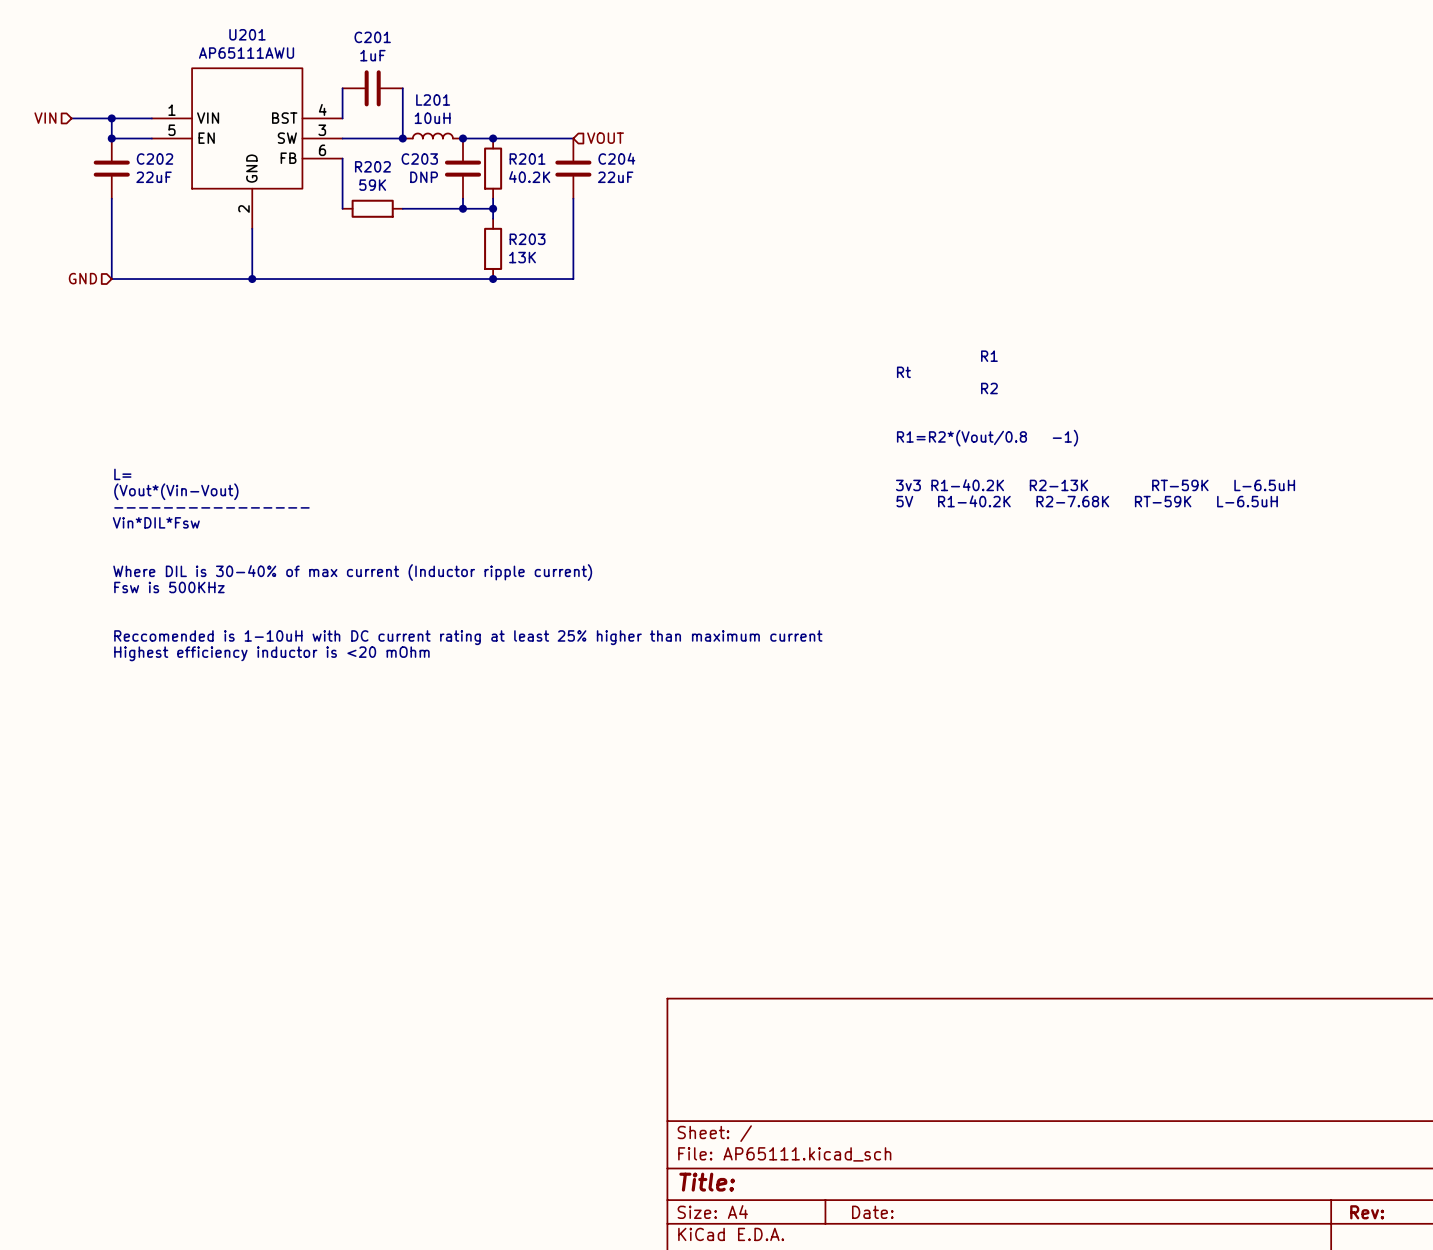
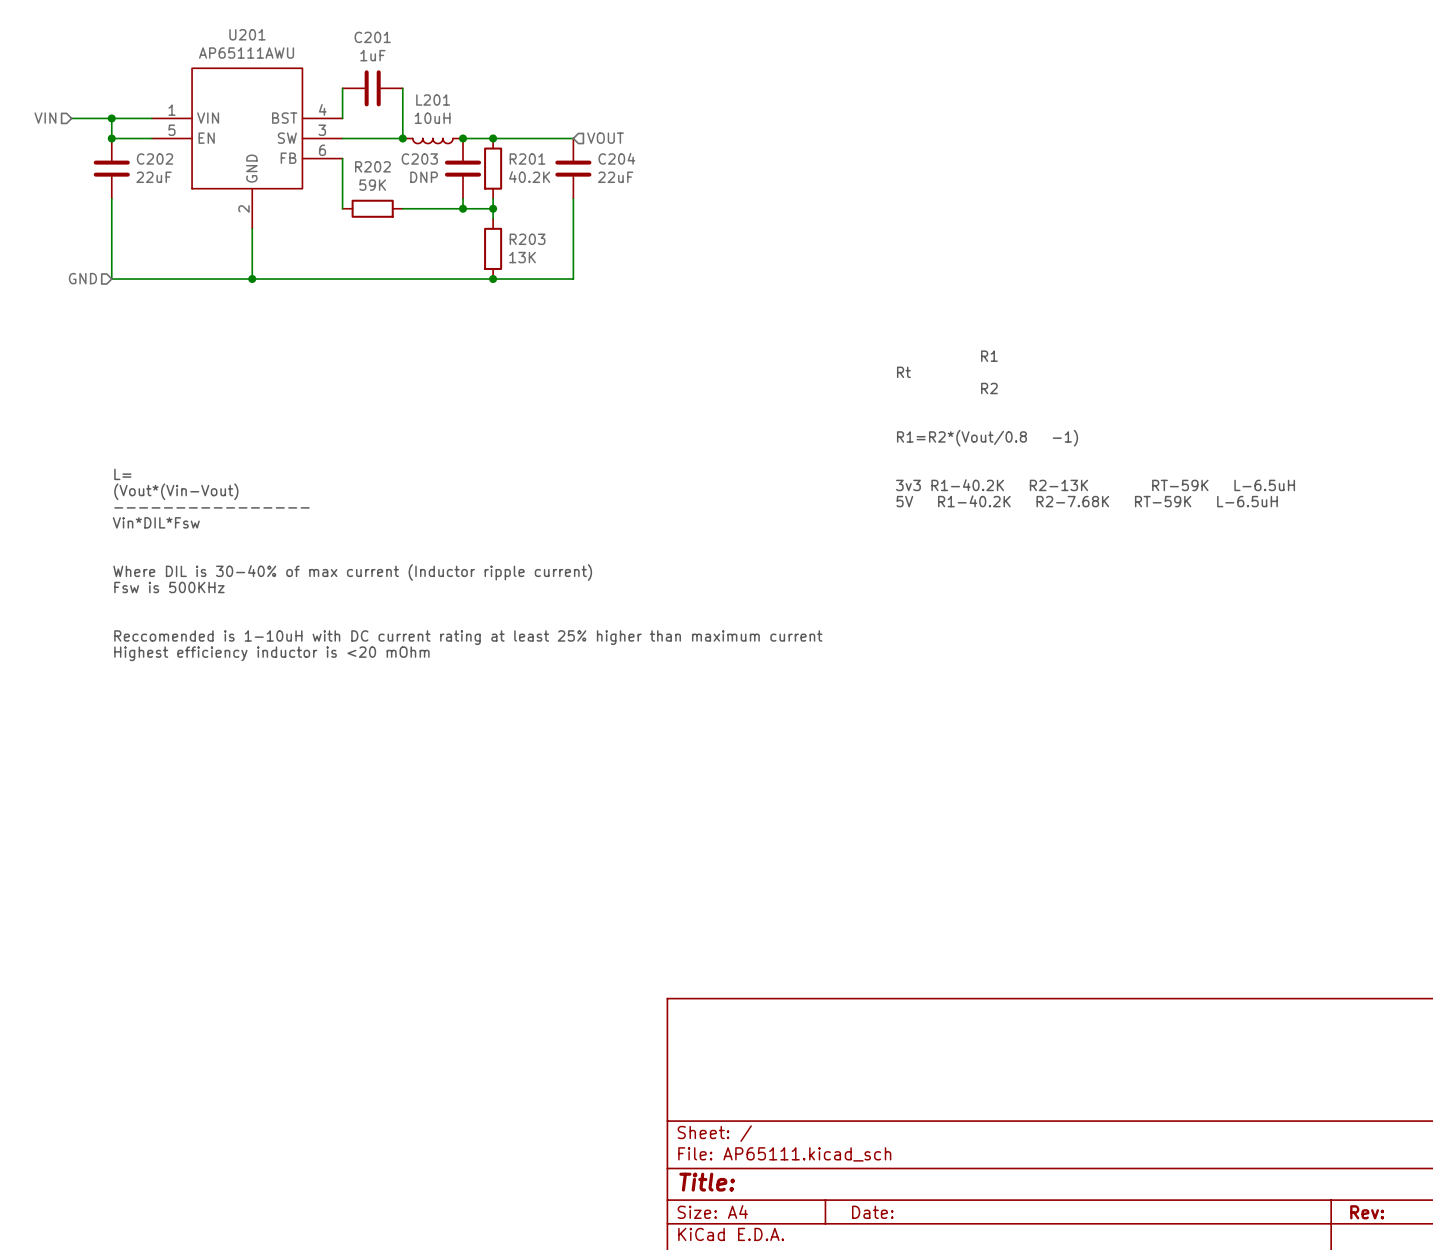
L201 symbol: [402, 133, 464, 139] -> [402, 138, 464, 144]

